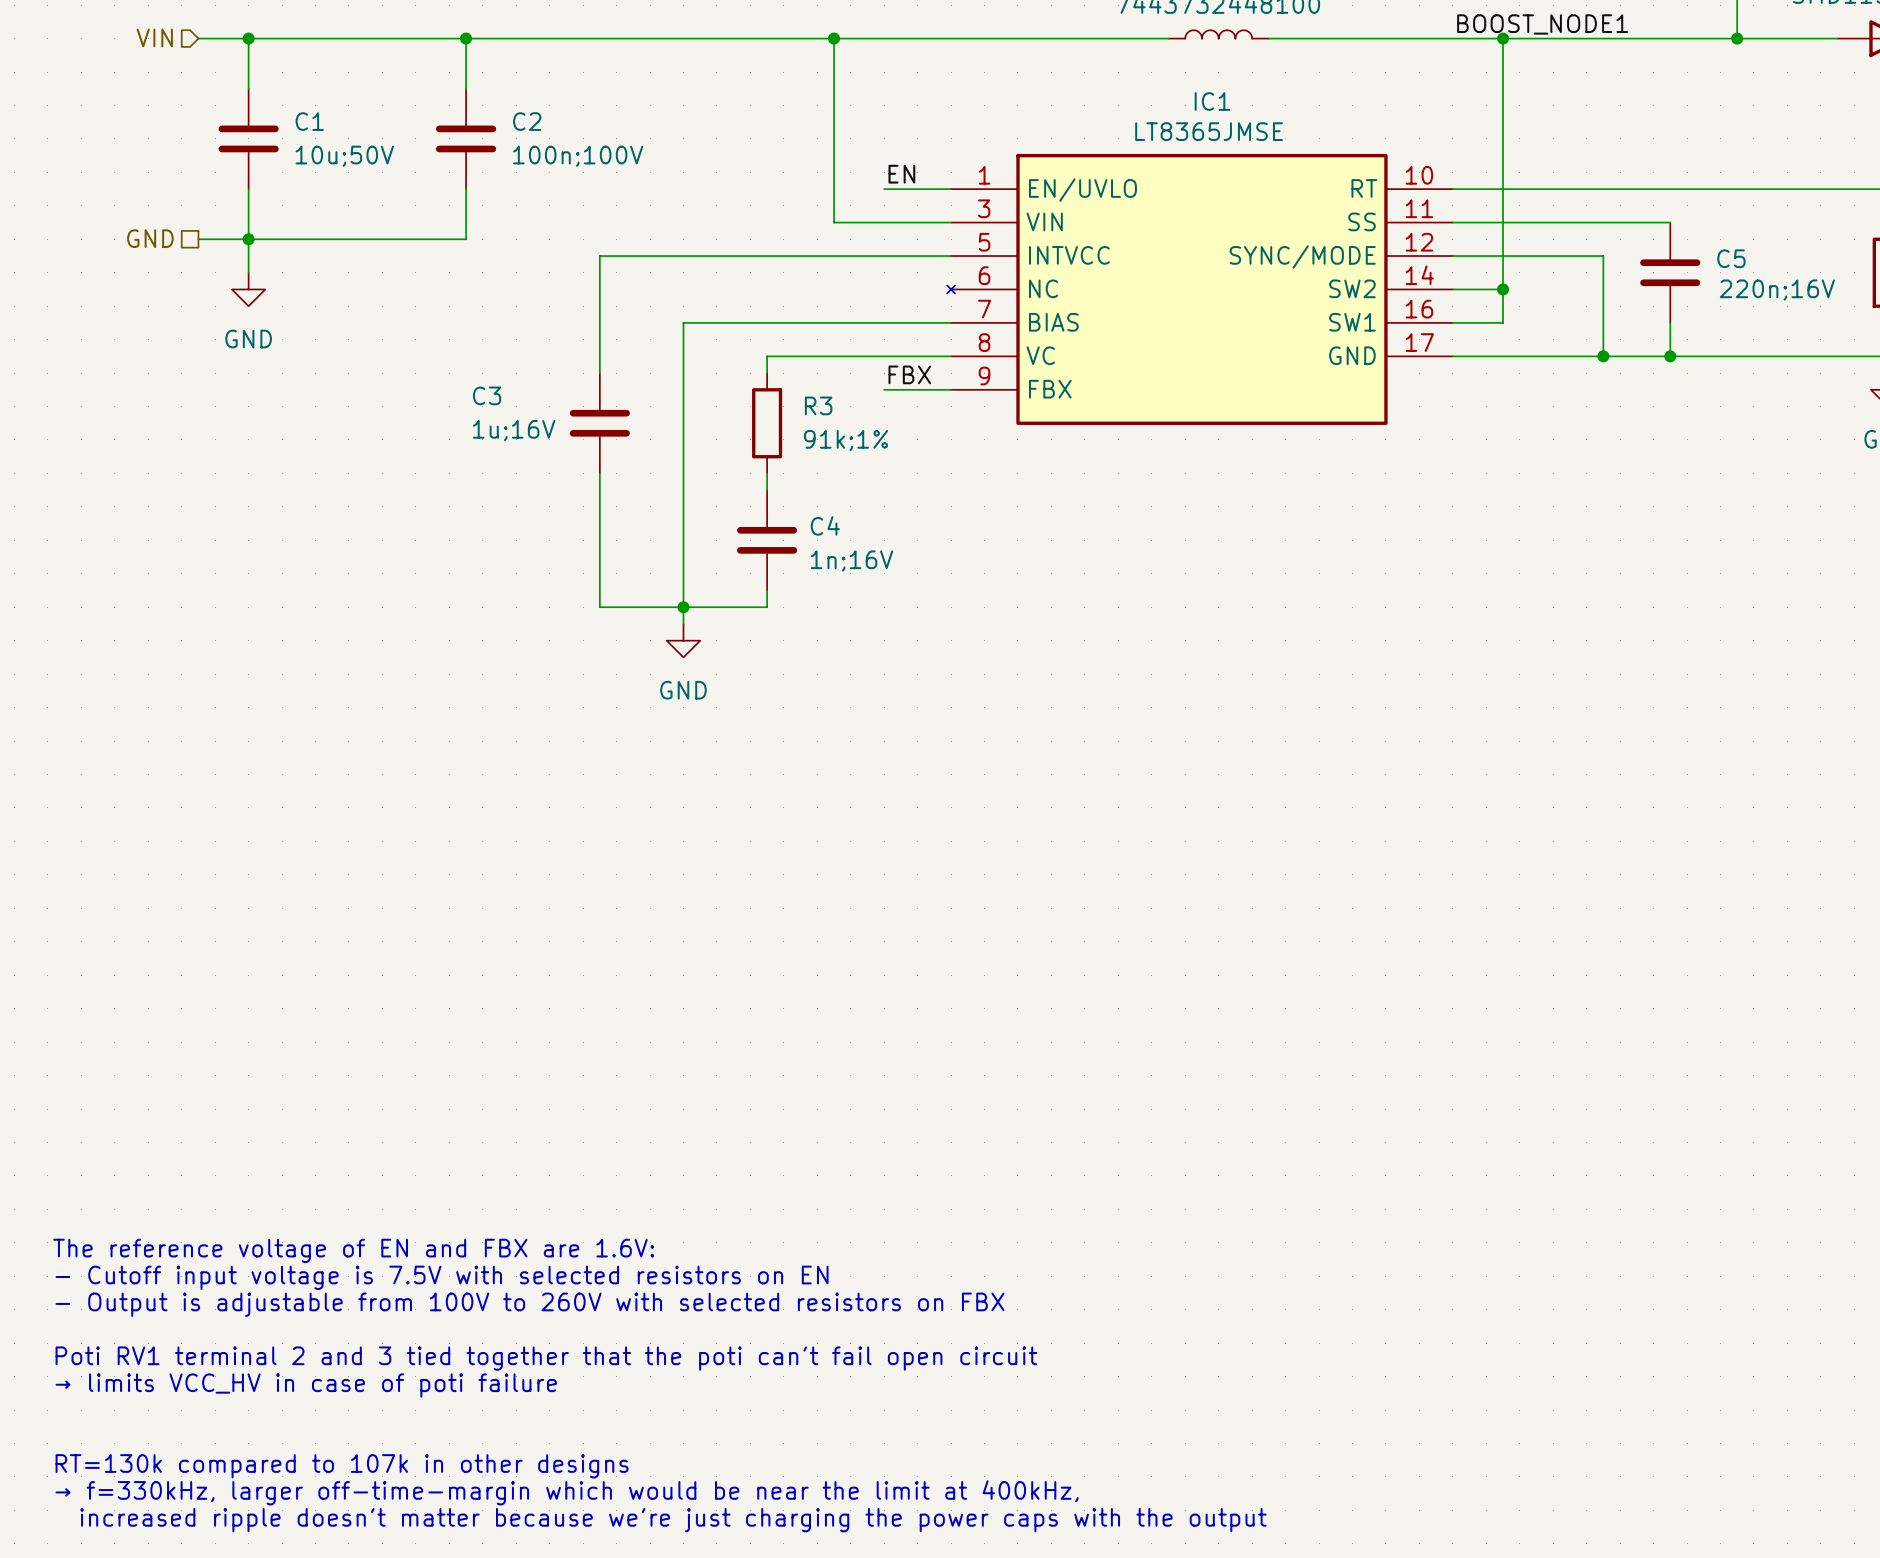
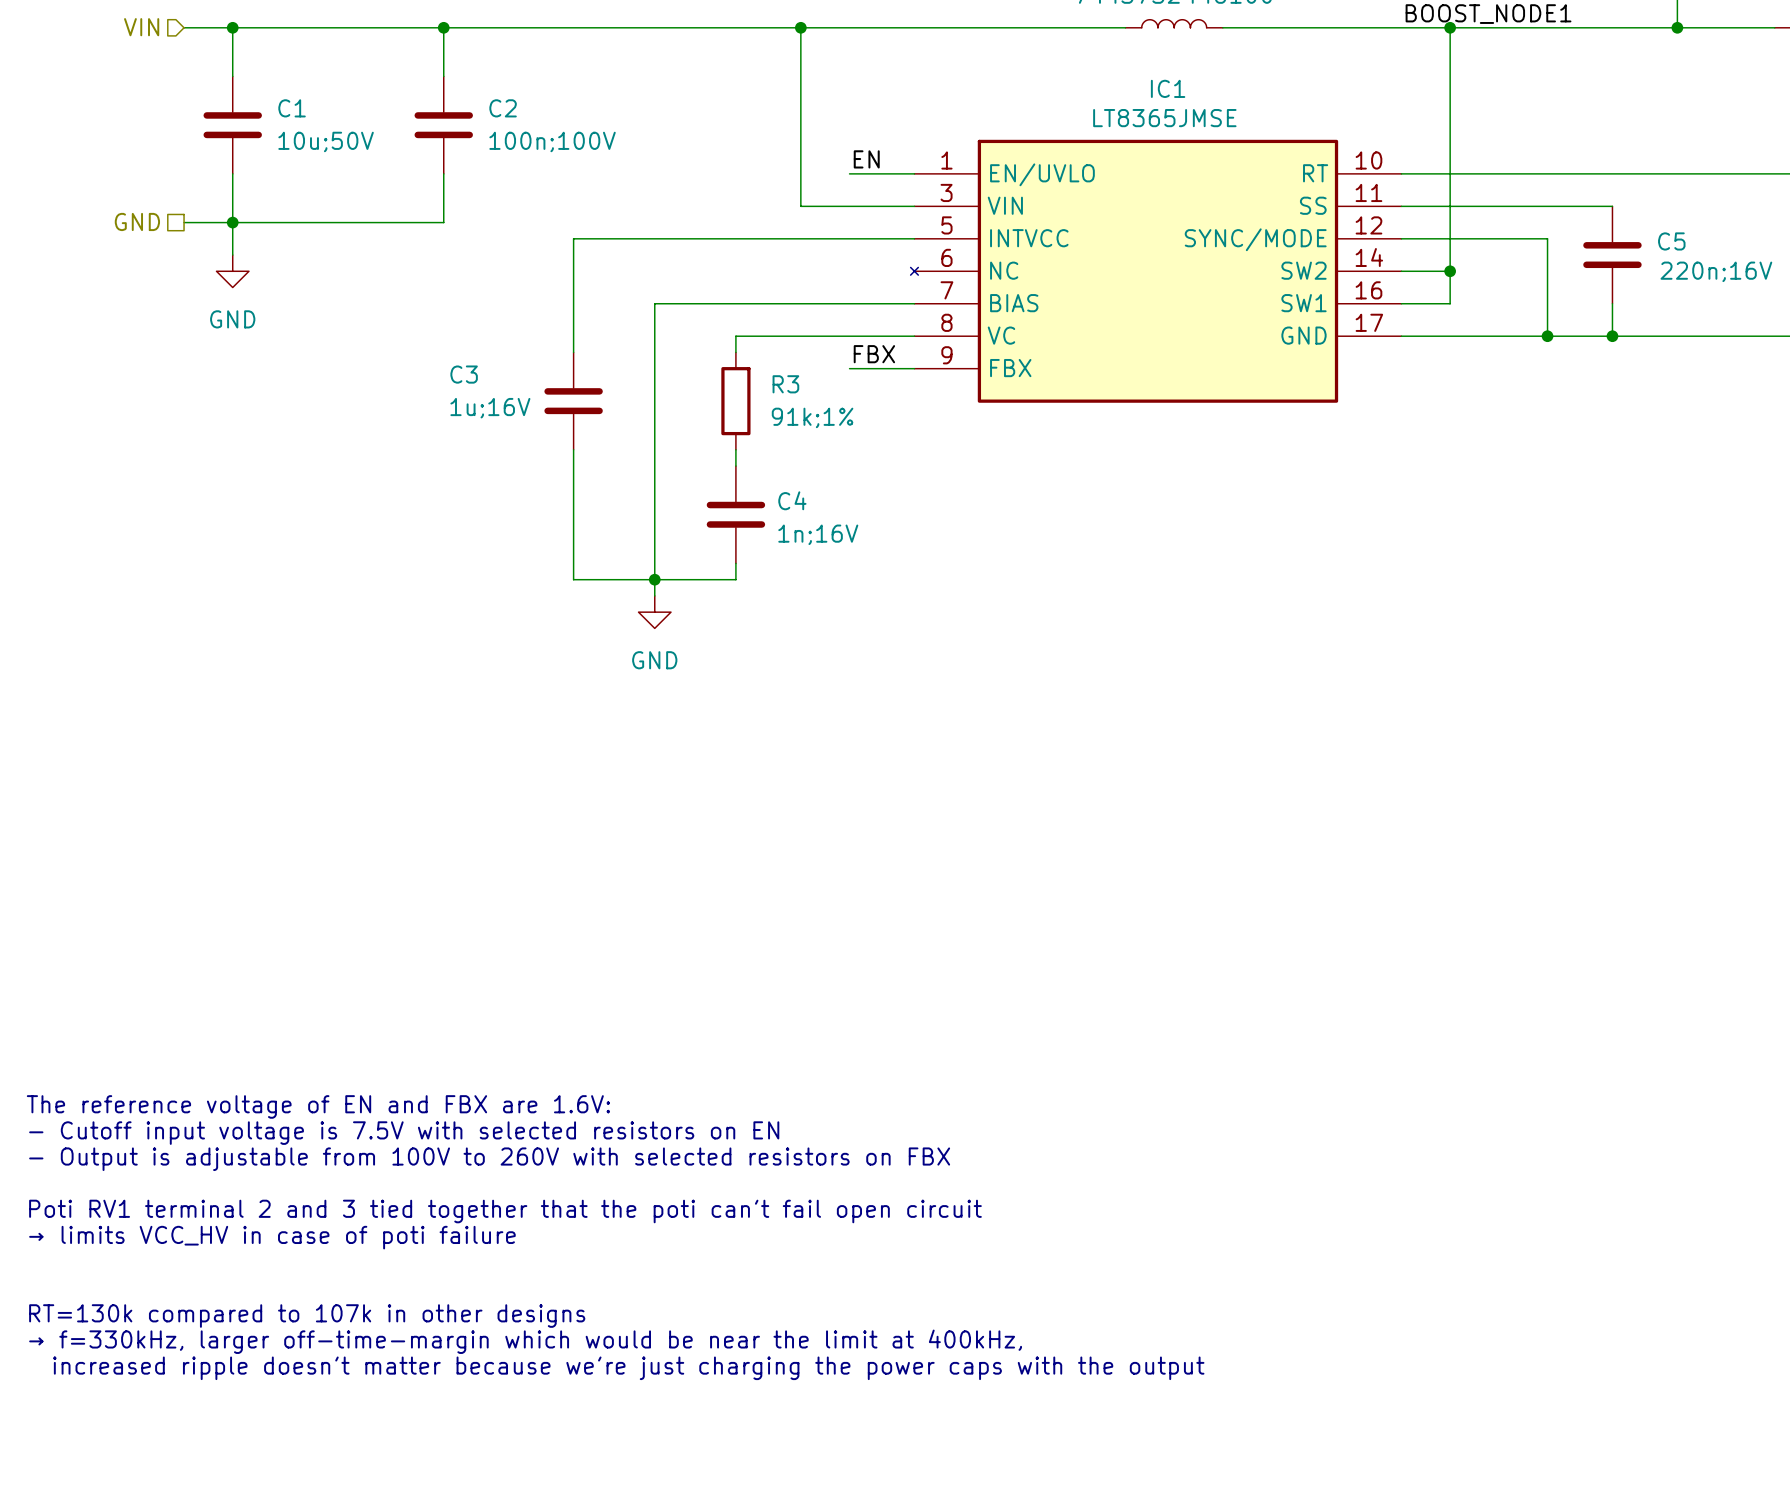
text position: The reference voltage of EN and FBX are 1.6V: (353, 1250) -> The reference voltage of EN and FBX are 1.6V: (318, 1106)
text position: - Cutoff input voltage is 7.5V with selected resistors on EN (442, 1277) -> - Cutoff input voltage is 7.5V with selected resistors on EN (404, 1133)
text position: - Output is adjustable from 100V to 260V with selected resistors on FBX (530, 1304) -> - Output is adjustable from 100V to 260V with selected resistors on FBX (489, 1159)
text position: Poti RV1 terminal 2 and 3 tied together that the poti can't fail open circuit (546, 1358) -> Poti RV1 terminal 2 and 3 tied together that the poti can't fail open circuit (505, 1211)
text position: → limits VCC_HV in case of poti failure (306, 1385) -> → limits VCC_HV in case of poti failure (272, 1237)
text position: RT=130k compared to 107k in other designs (342, 1466) -> RT=130k compared to 107k in other designs (307, 1316)
text position: → f=330kHz, larger off-time-margin which would be near the limit at 400kHz, (567, 1492) -> → f=330kHz, larger off-time-margin which would be near the limit at 400kHz, (525, 1341)
text position: increased ripple doesn't matter because we're just charging the power caps with the output (673, 1520) -> increased ripple doesn't matter because we're just charging the power caps with the output (628, 1368)

